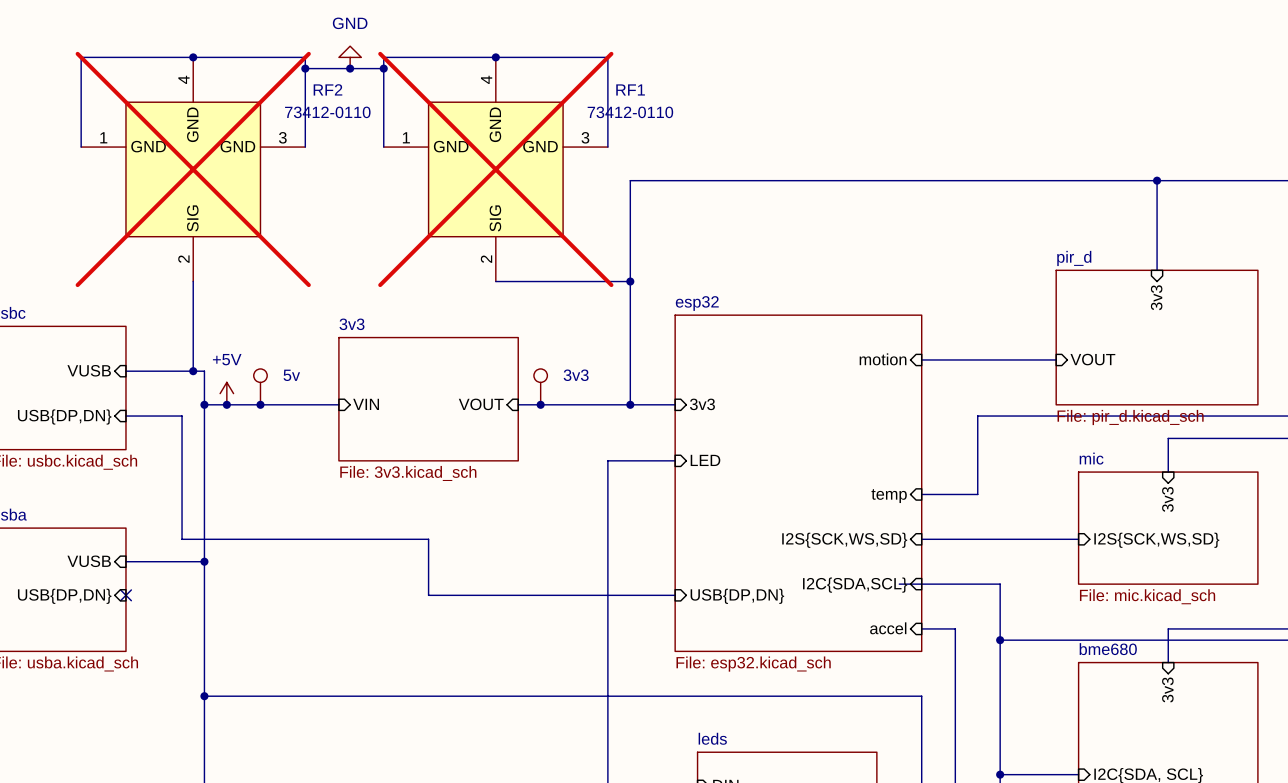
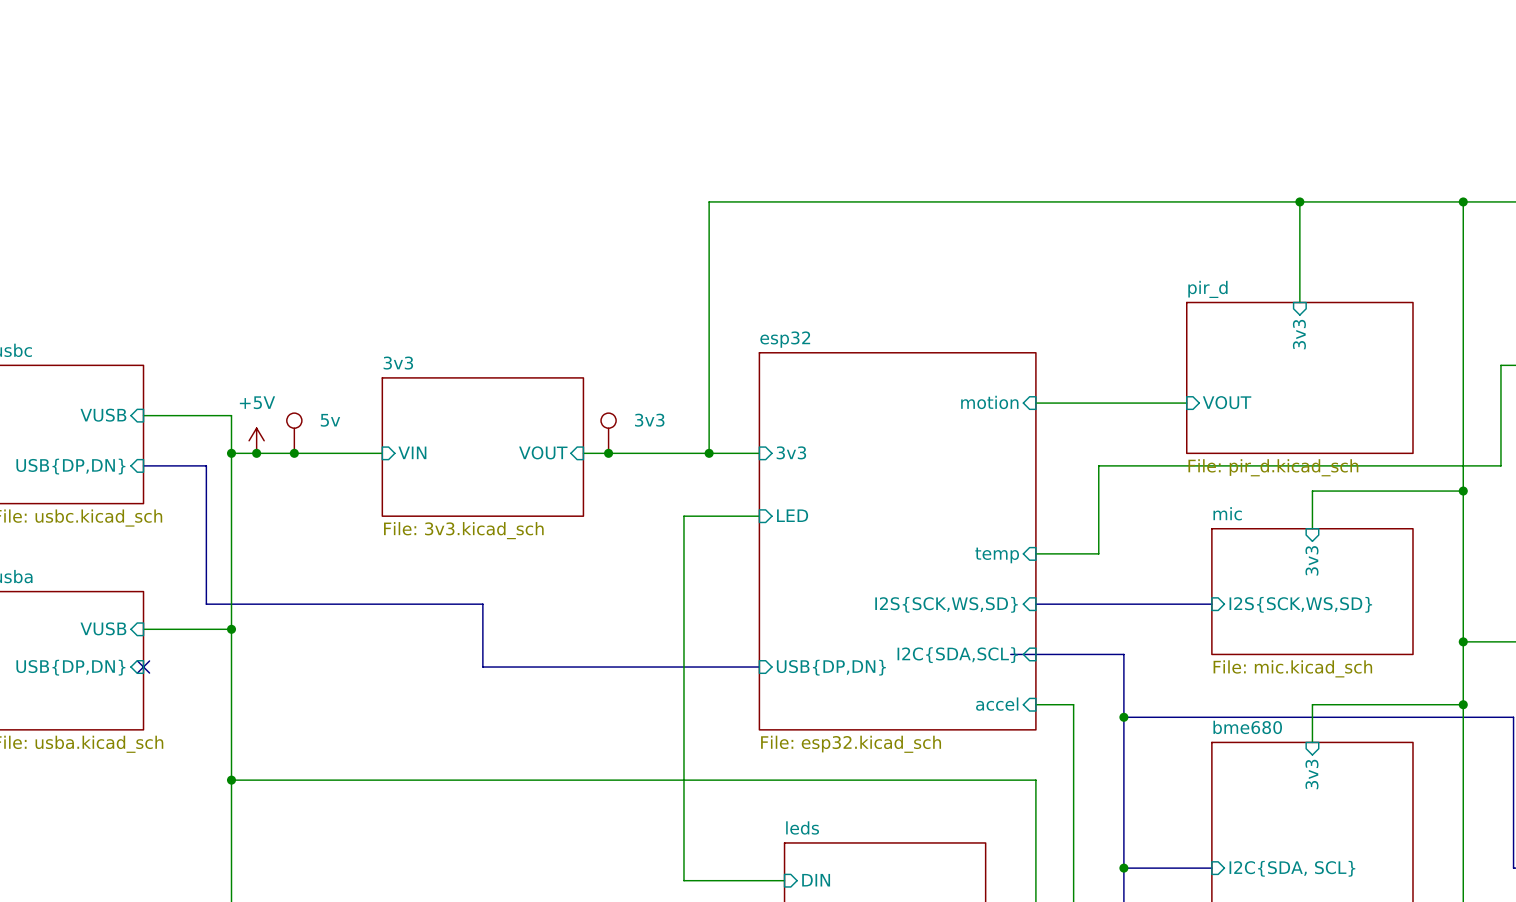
junction: (193, 57) -> none
power symbol: GND (350, 57) -> none
junction: (495, 57) -> none
wire: (305, 68) (383, 68) -> none
junction: (305, 68) -> none
junction: (350, 68) -> none
junction: (383, 68) -> none
wire: (81, 147) (81, 57) (305, 57) (305, 147) -> none
wire: (383, 147) (383, 57) (607, 57) (607, 147) -> none
RF2: 73412-0110 (193, 169) -> none
RF1: 73412-0110 (495, 169) -> none
wire: (193, 281) (193, 371) -> none
wire: (495, 281) (630, 281) -> none
junction: (630, 281) -> none
junction: (193, 371) -> none

